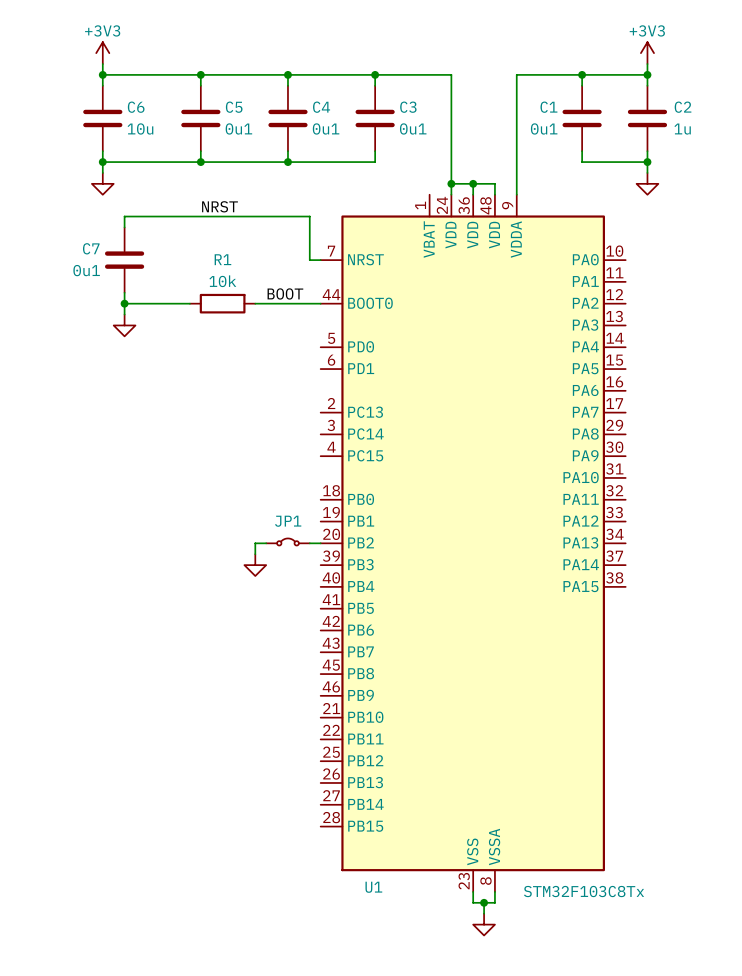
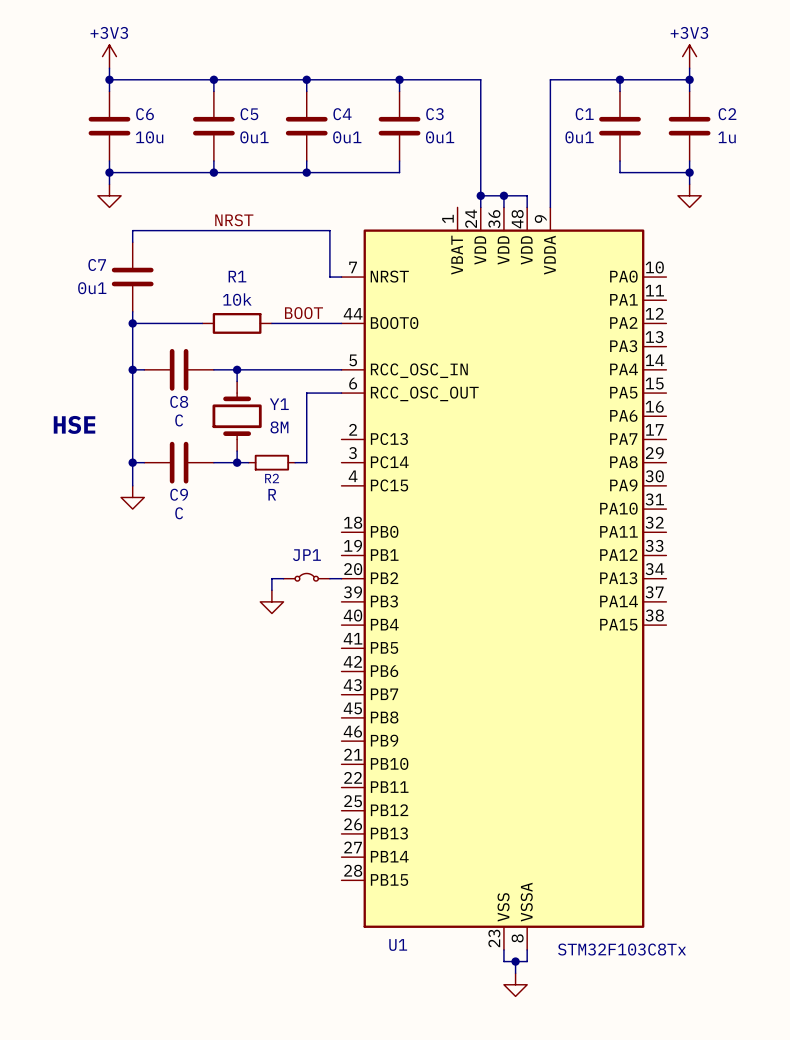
wire: none -> (132, 335) (132, 485)
power symbol position: (124, 325) -> (132, 497)
U1 pin name: PD0 (361, 346) -> RCC_OSC_IN (419, 370)
wire: none -> (132, 369) (144, 369)
junction: none -> (132, 369)
C8: none -> C (179, 369)
wire: none -> (213, 369) (341, 369)
wire: none -> (237, 369) (237, 381)
junction: none -> (237, 369)
U1 pin name: PD1 (361, 368) -> RCC_OSC_OUT (424, 393)
wire: none -> (341, 393) (306, 393) (306, 462) (295, 462)
Y1: none -> 8M (237, 416)
text: none -> HSE (74, 424)
wire: none -> (237, 451) (237, 462)
wire: none -> (132, 462) (144, 462)
junction: none -> (132, 462)
C9: none -> C (179, 462)
wire: none -> (213, 462) (248, 462)
junction: none -> (237, 462)
R2: none -> R (271, 462)

